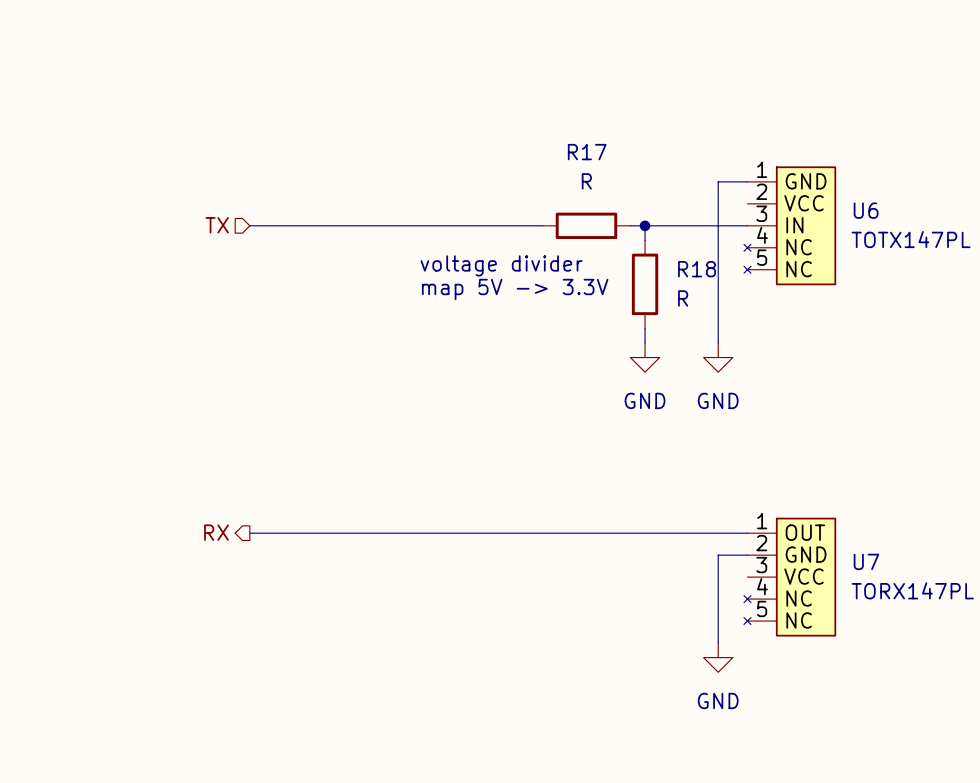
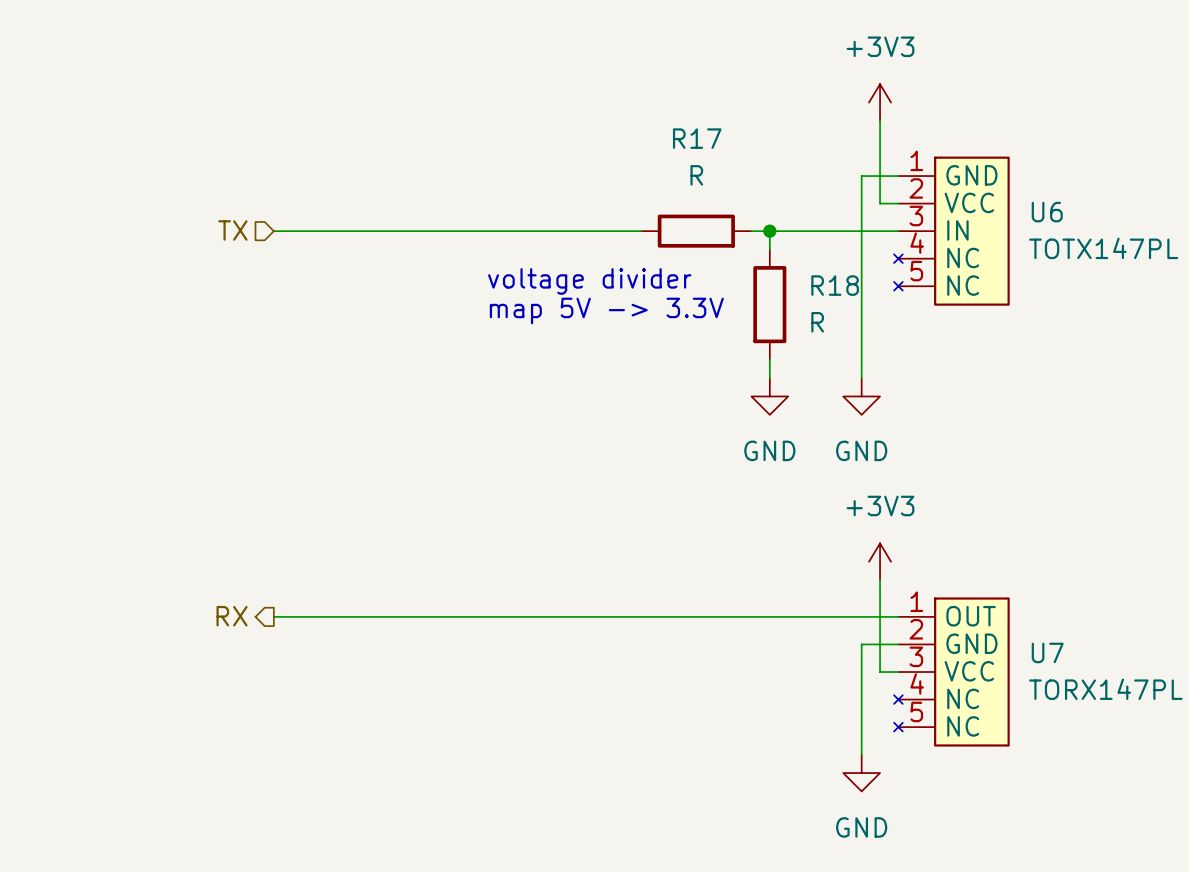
power symbol: none -> +3V3 (880, 102)
wire: none -> (880, 120) (880, 203) (898, 203)
power symbol: none -> +3V3 (880, 561)
wire: none -> (880, 580) (880, 672) (898, 672)

